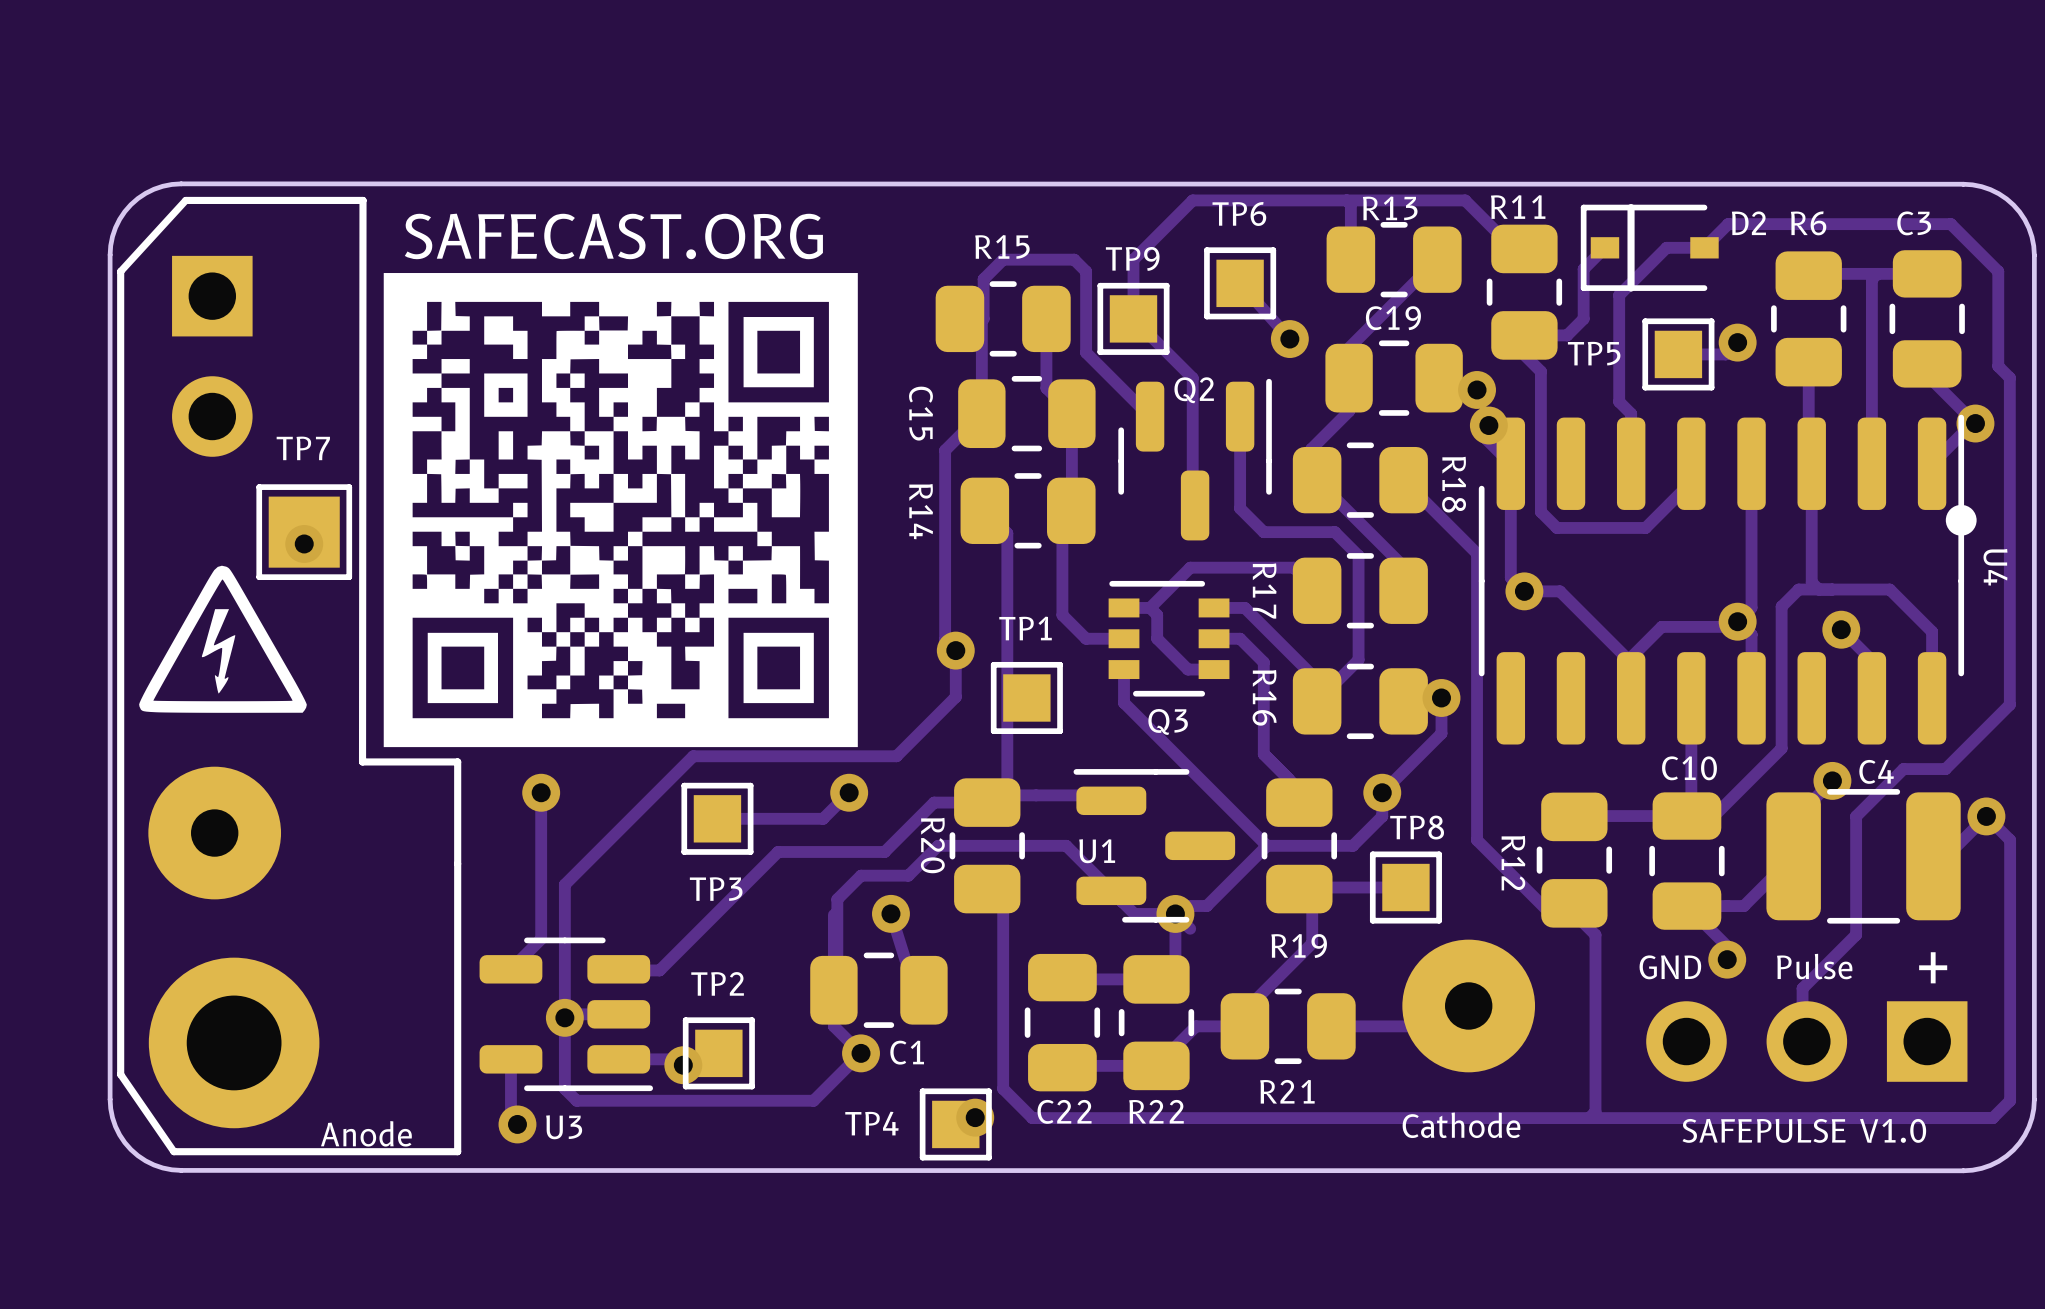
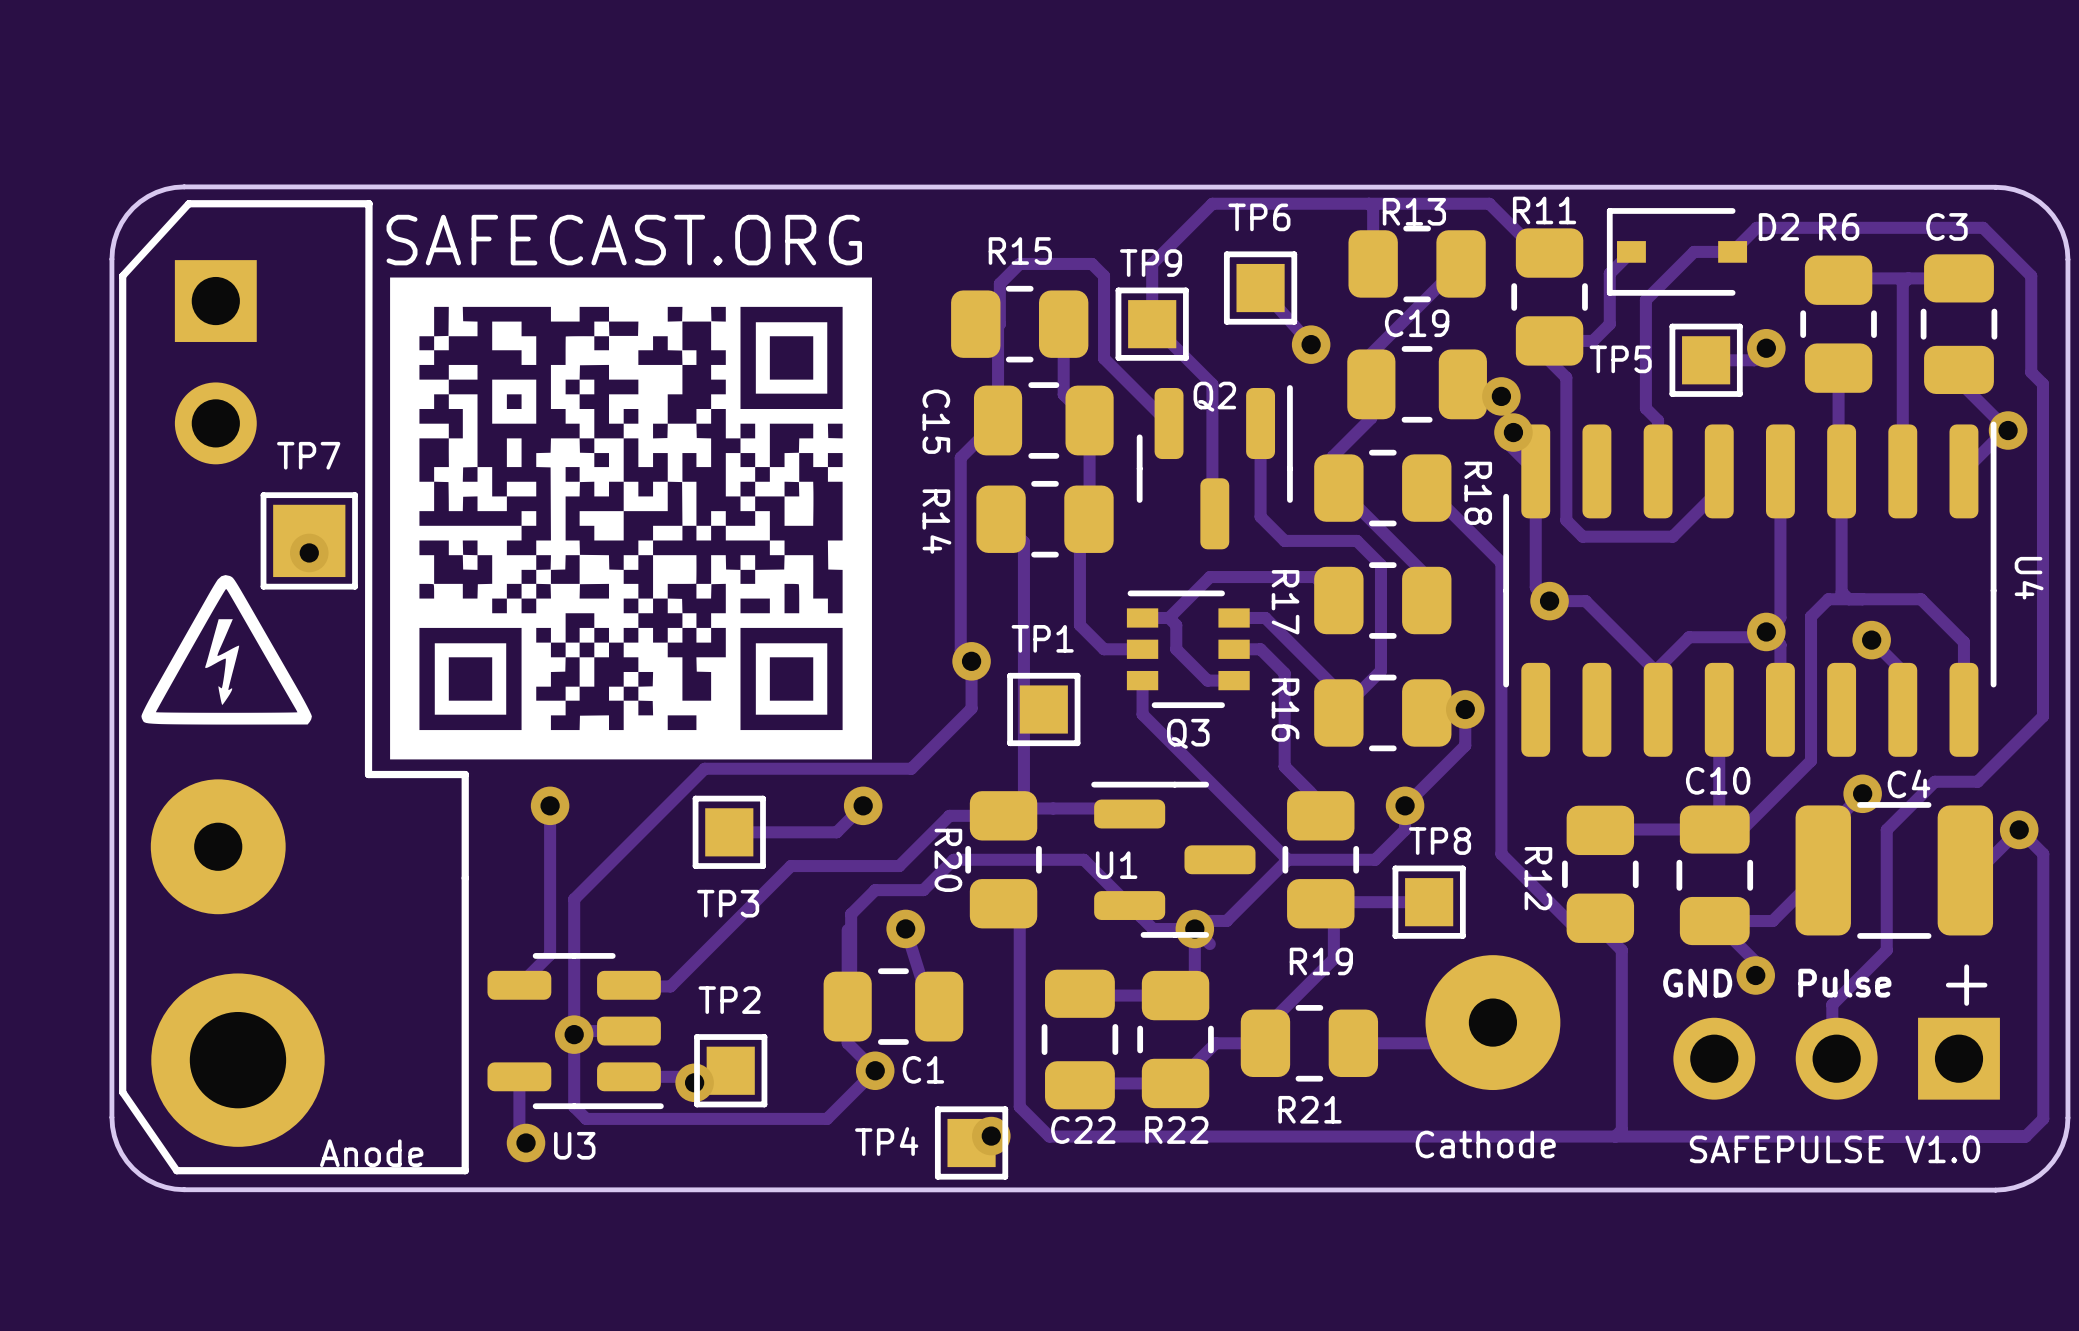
line: (1631, 207) (1631, 288) -> none
drawing: [1945, 504, 1977, 536] -> none

